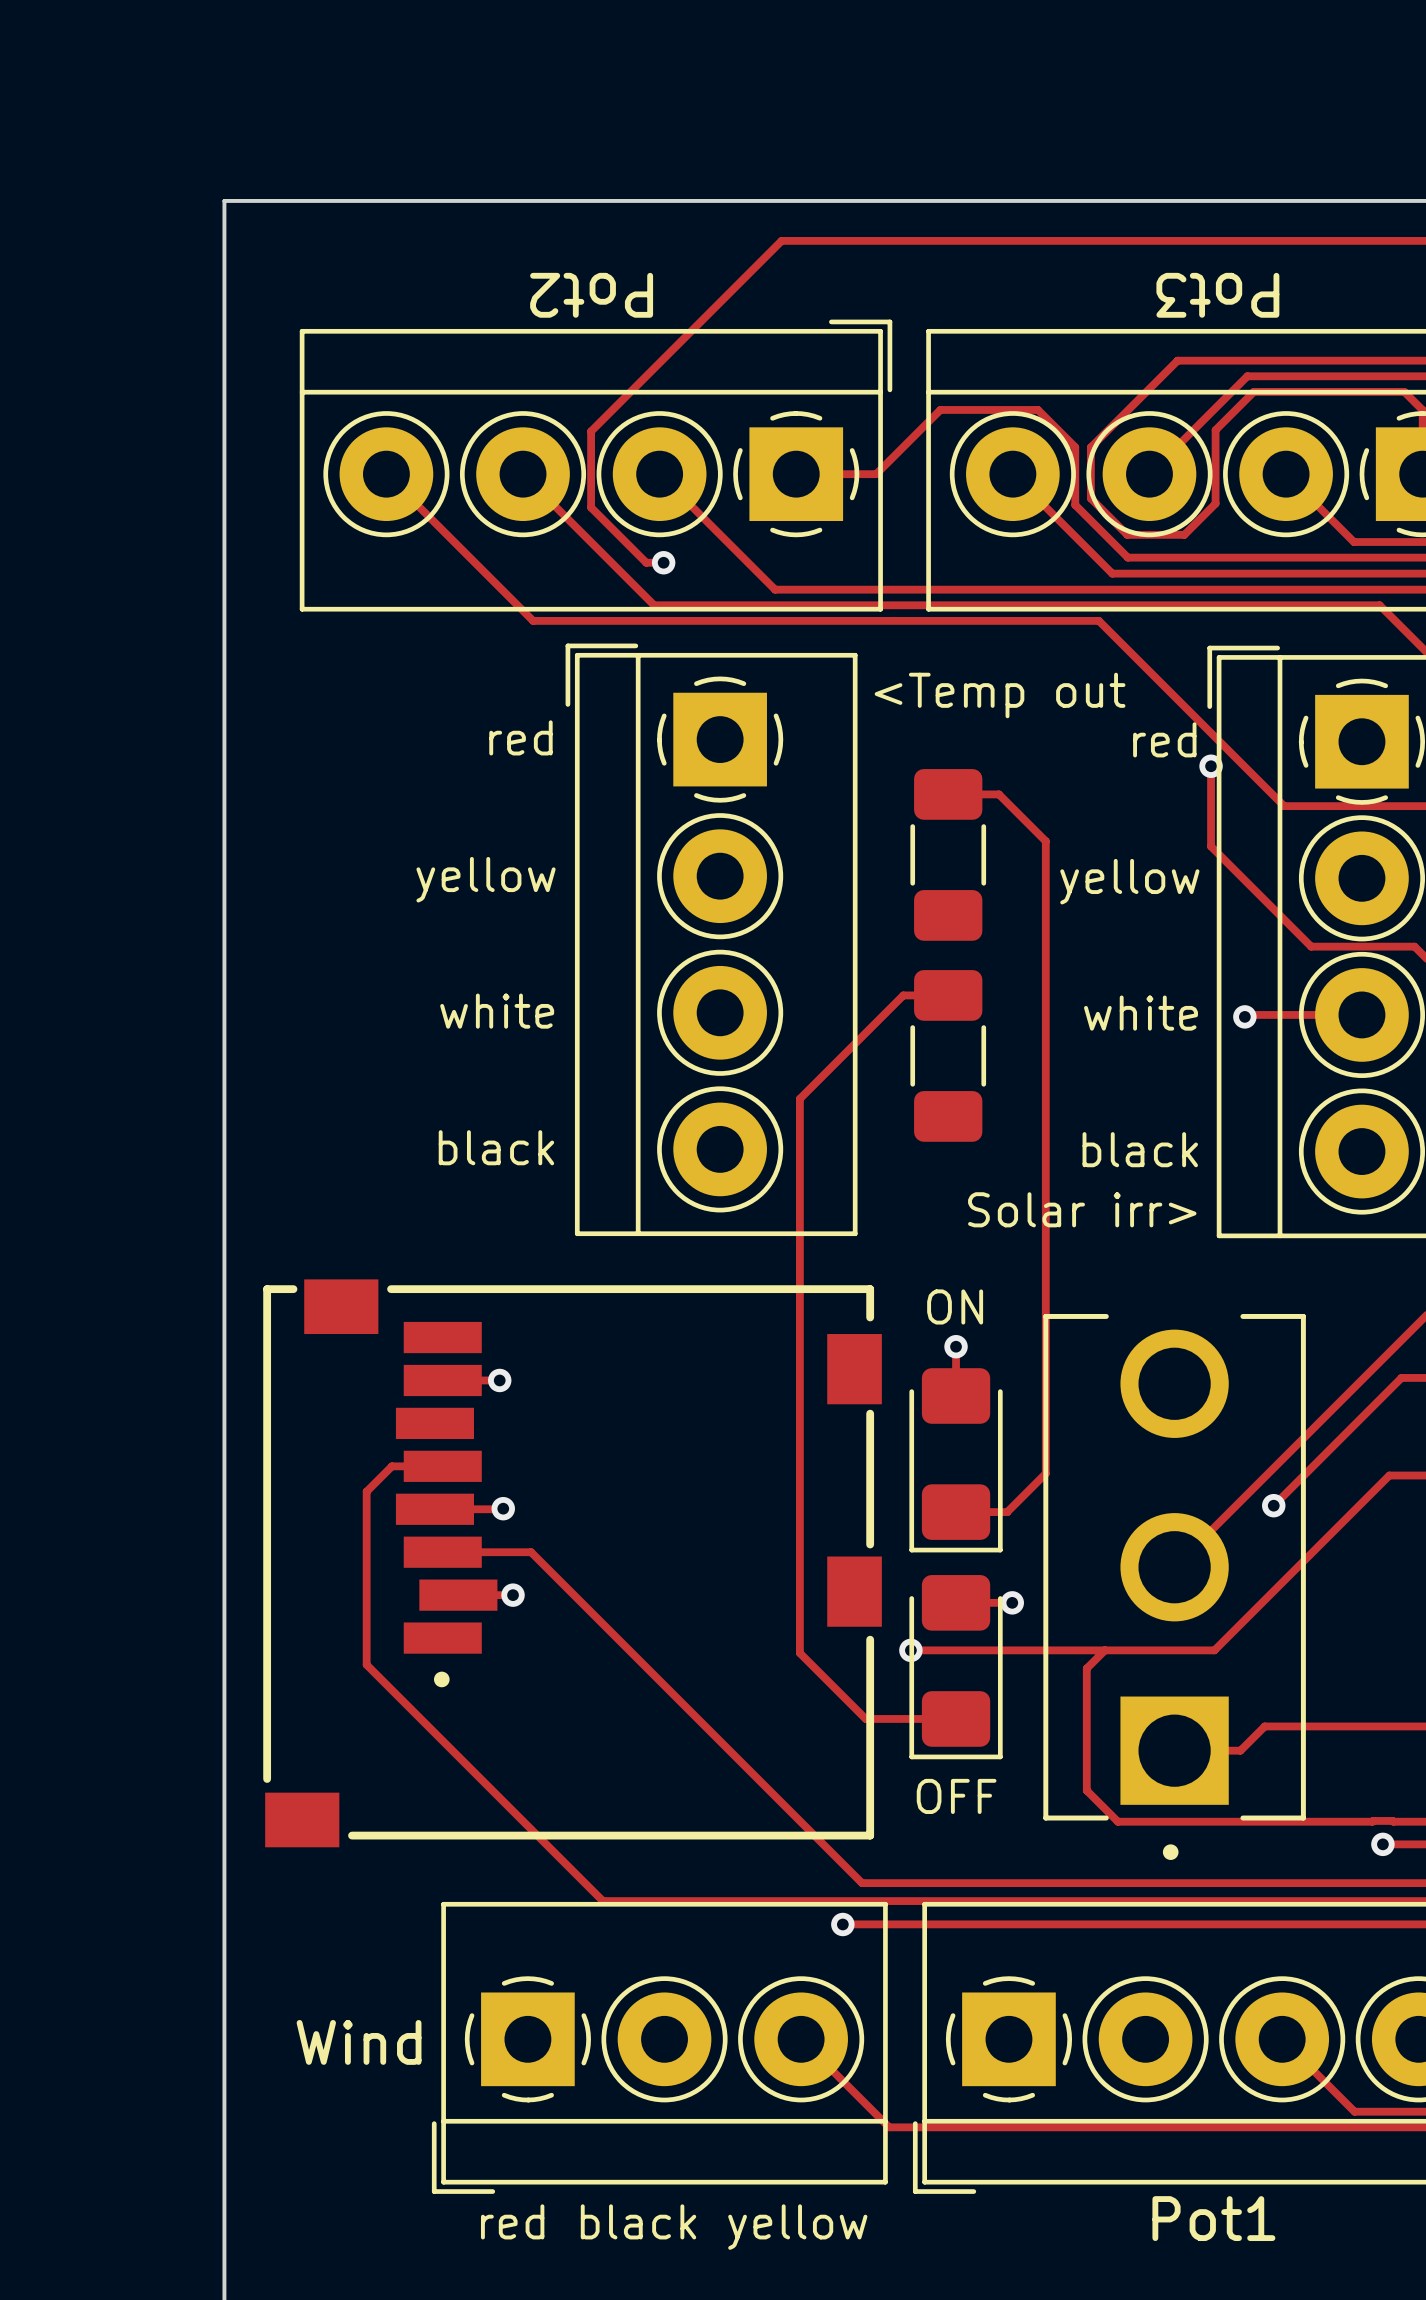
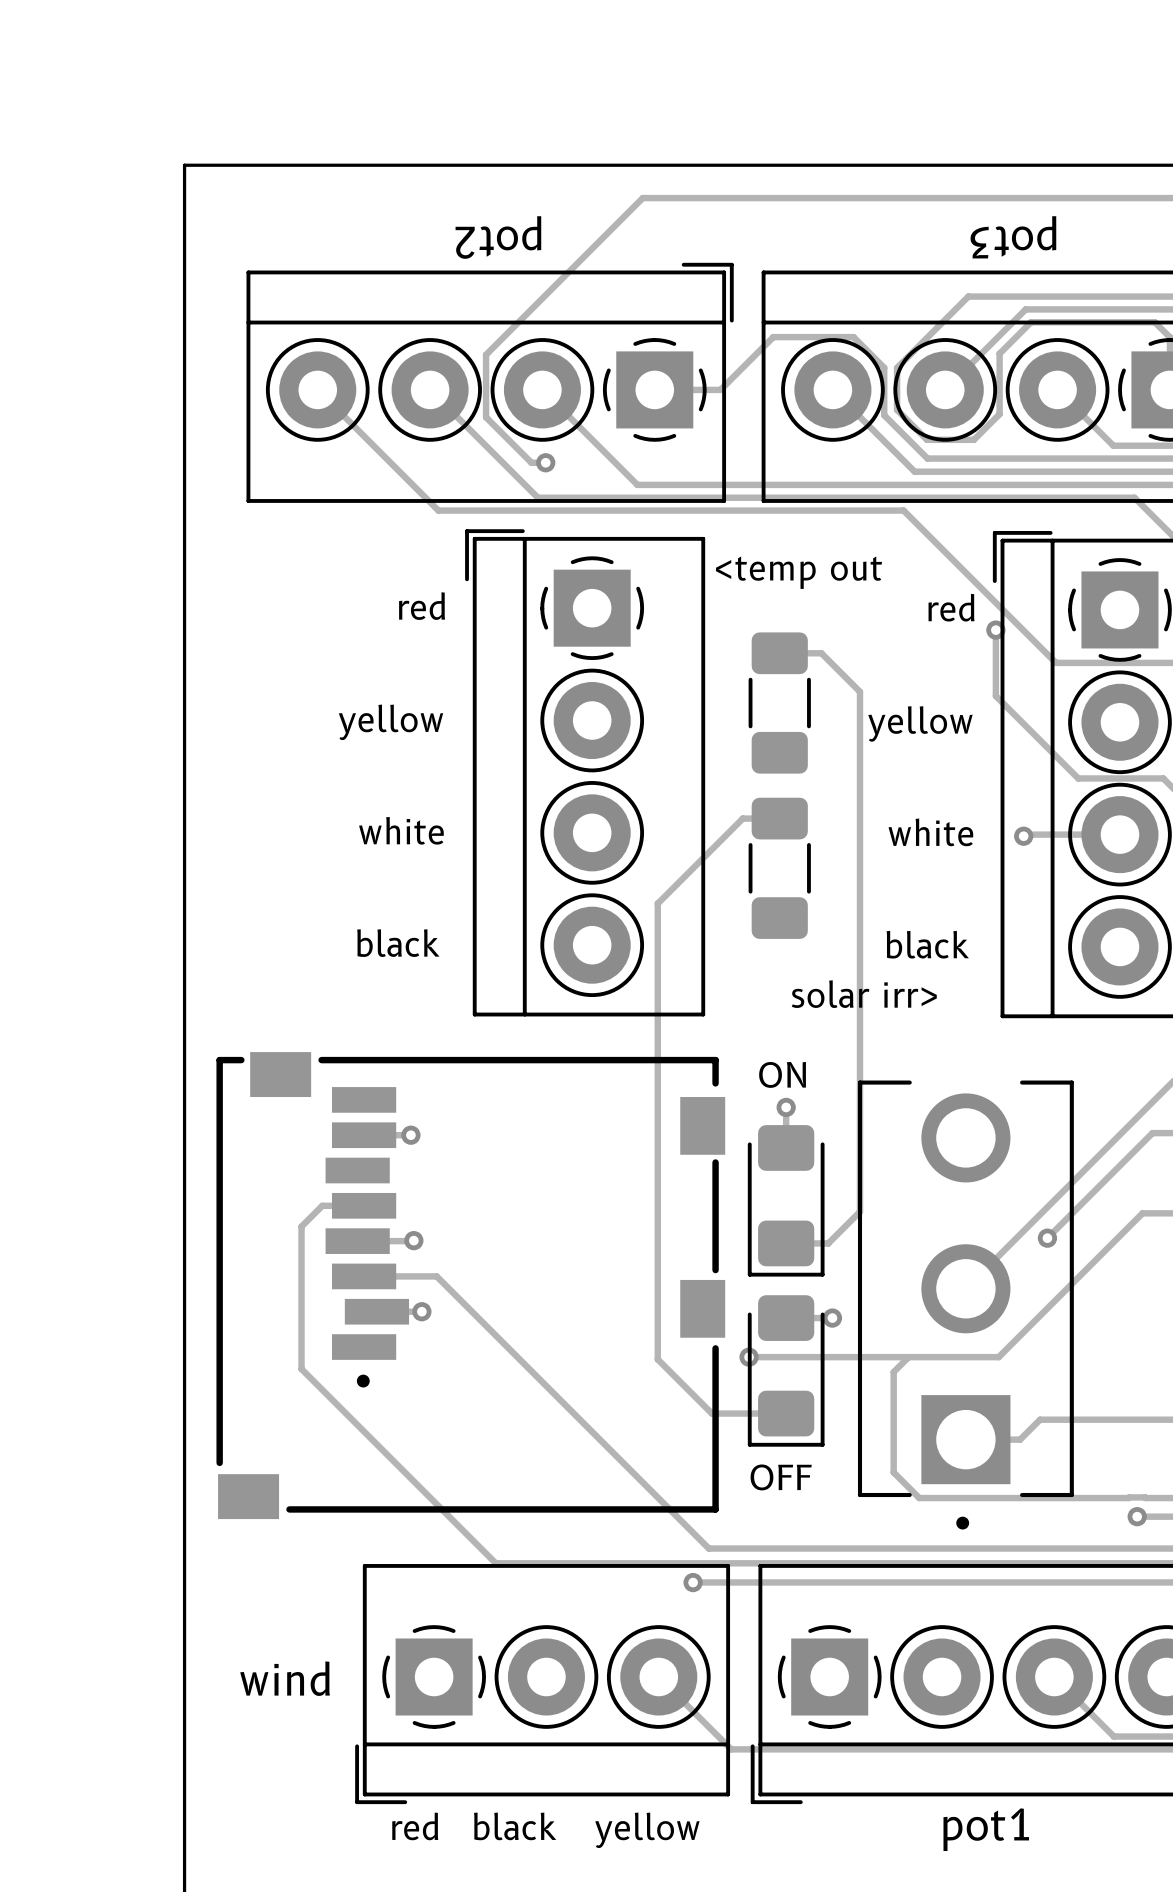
text: Pot2 (591, 295) -> pot2 (498, 237)
text: Pot3 (1217, 295) -> pot3 (1013, 237)
text: <Temp out (1000, 695) -> <temp out (799, 572)
text: Solar irr> (1082, 1209) -> solar irr> (864, 994)
text: Wind (359, 2042) -> wind (285, 1678)
text: Pot1 (1213, 2218) -> pot1 (986, 1829)

